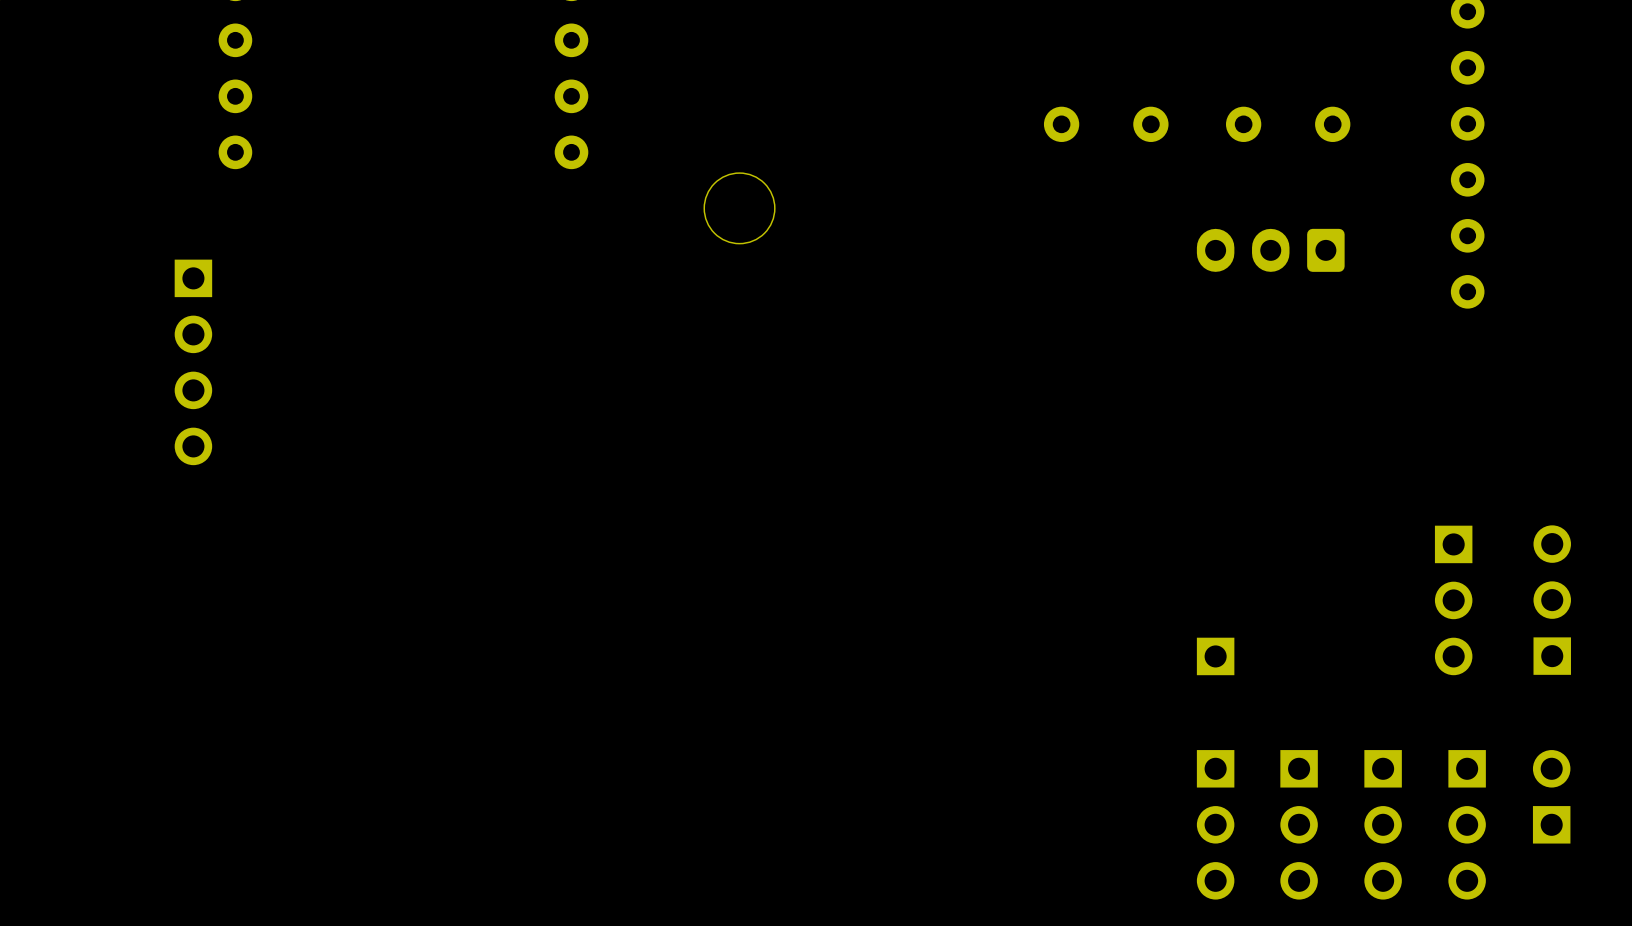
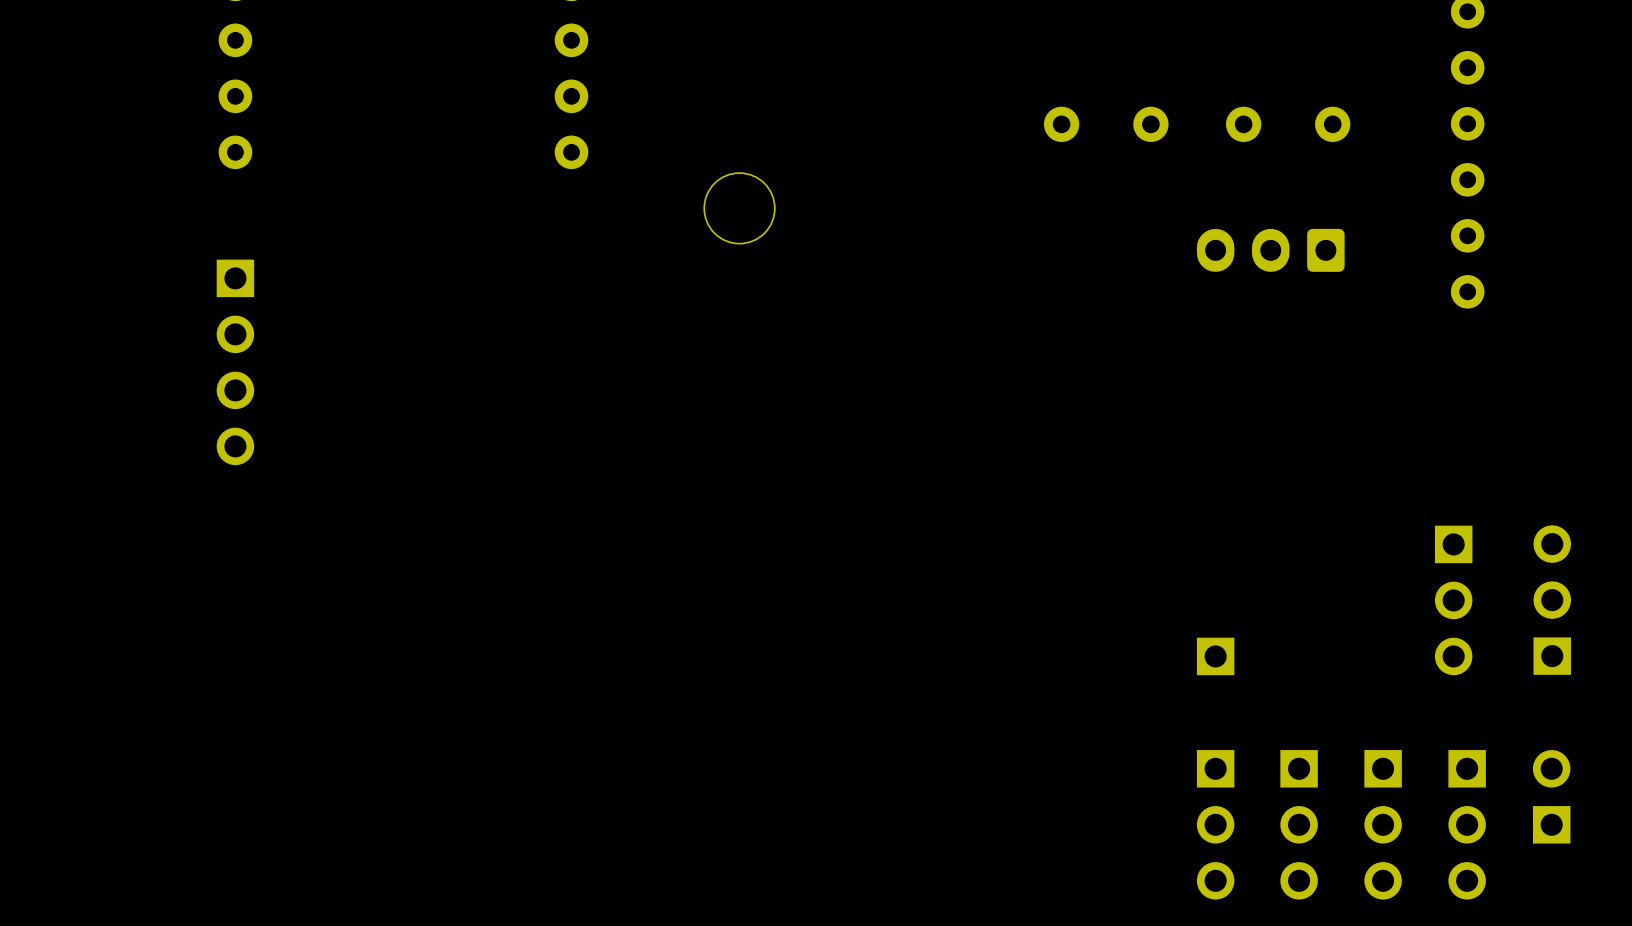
part position: (193, 362) -> (235, 362)

